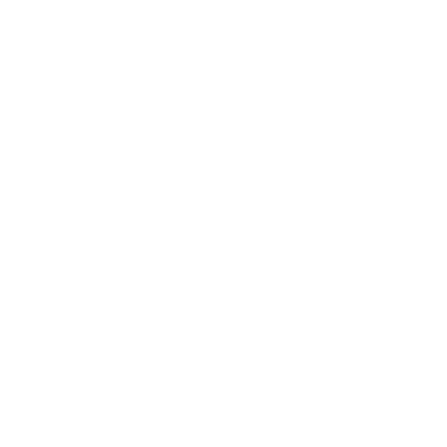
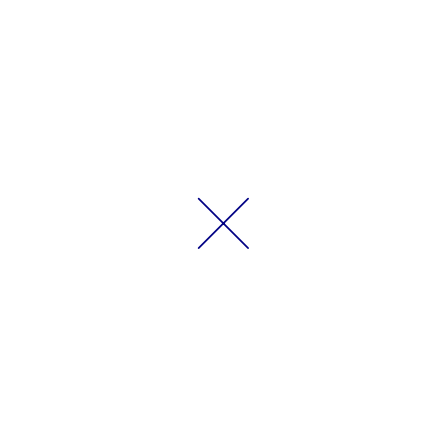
no-connect mark: none -> (223, 223)

